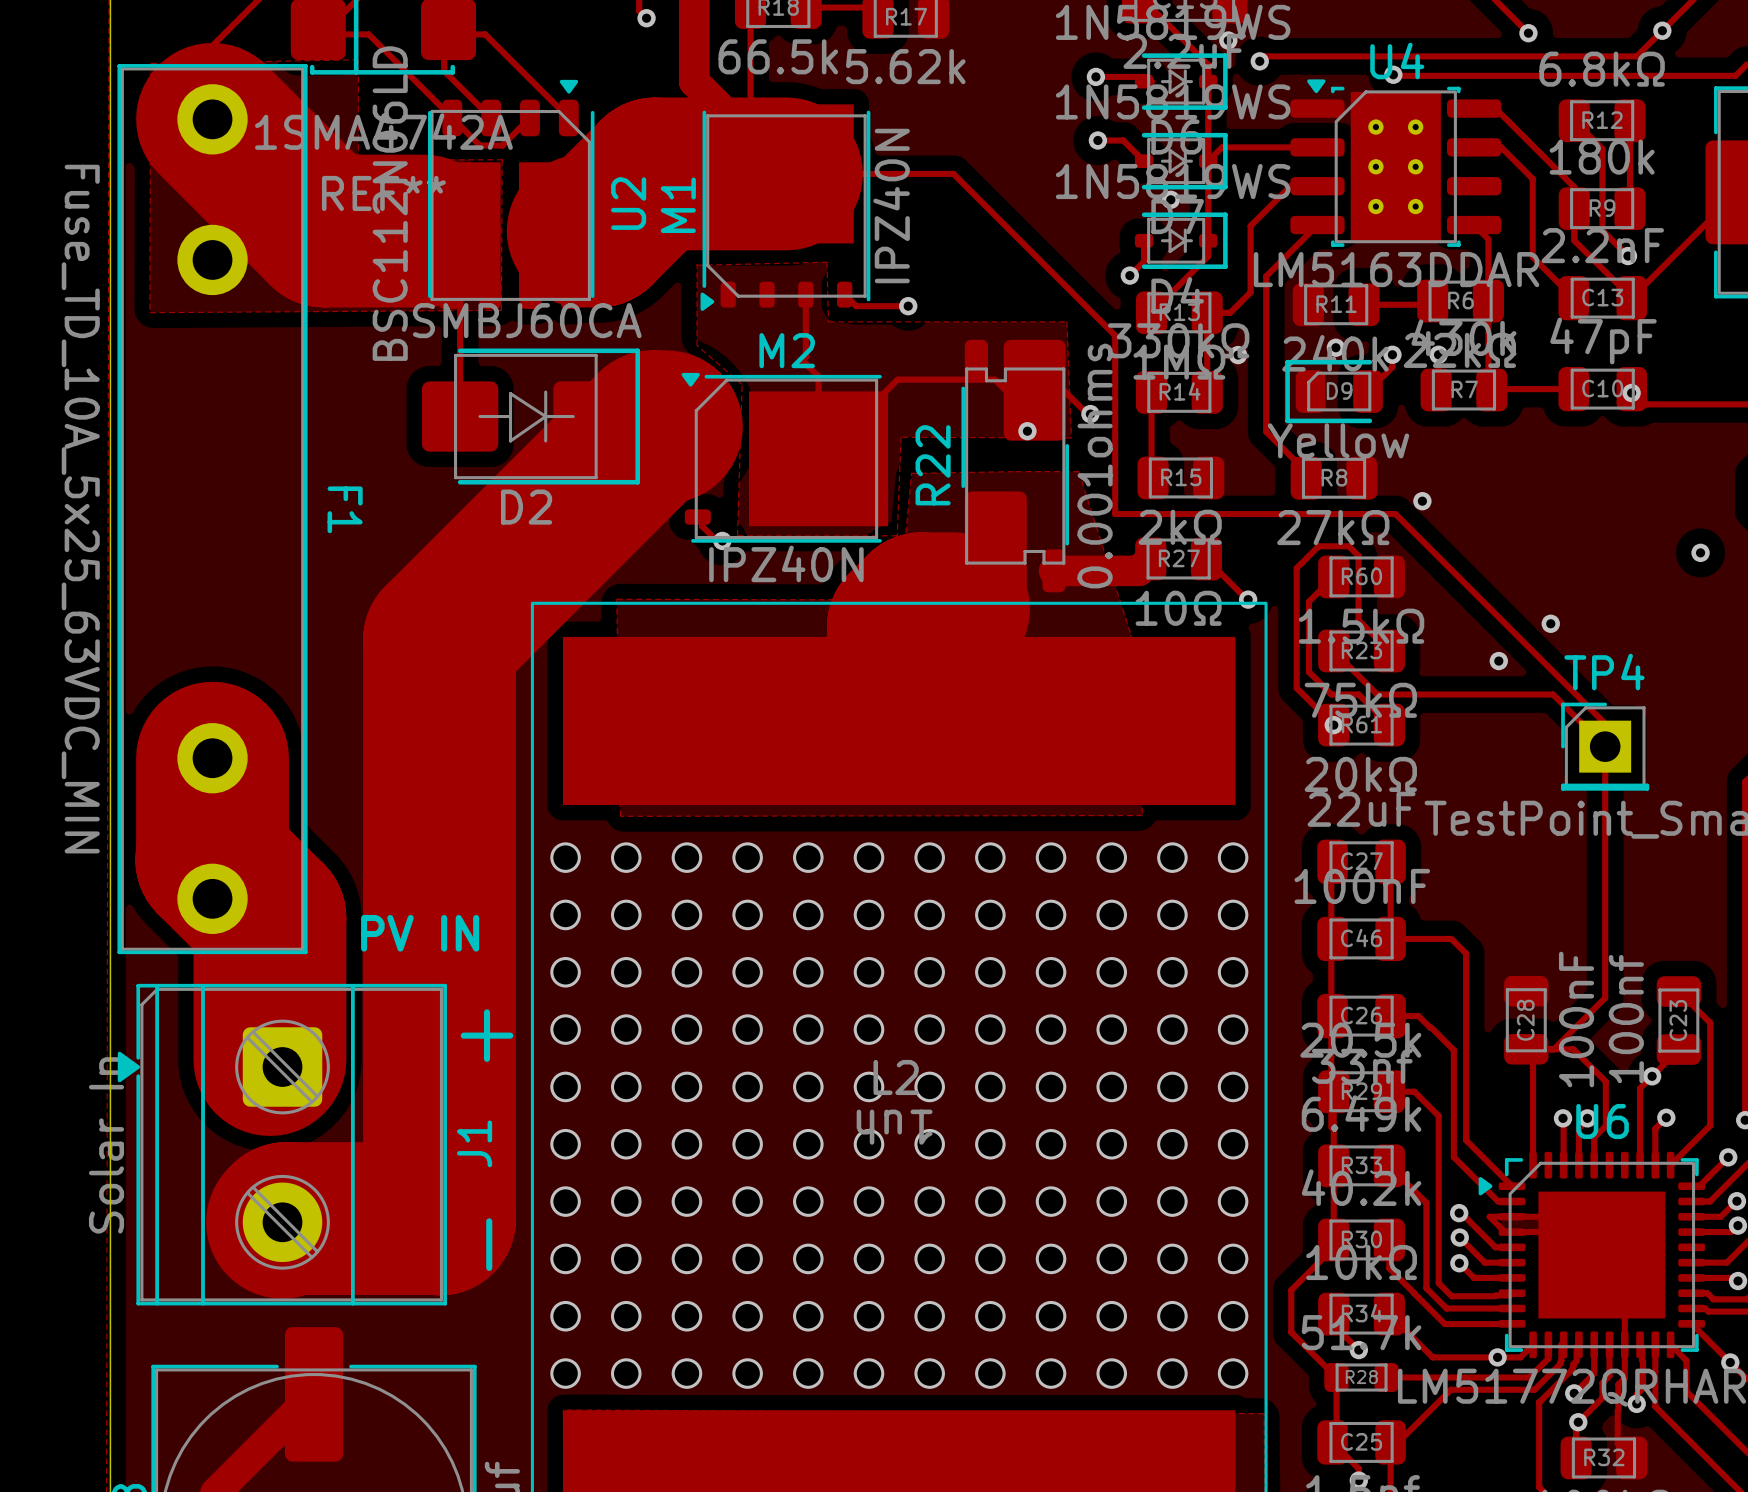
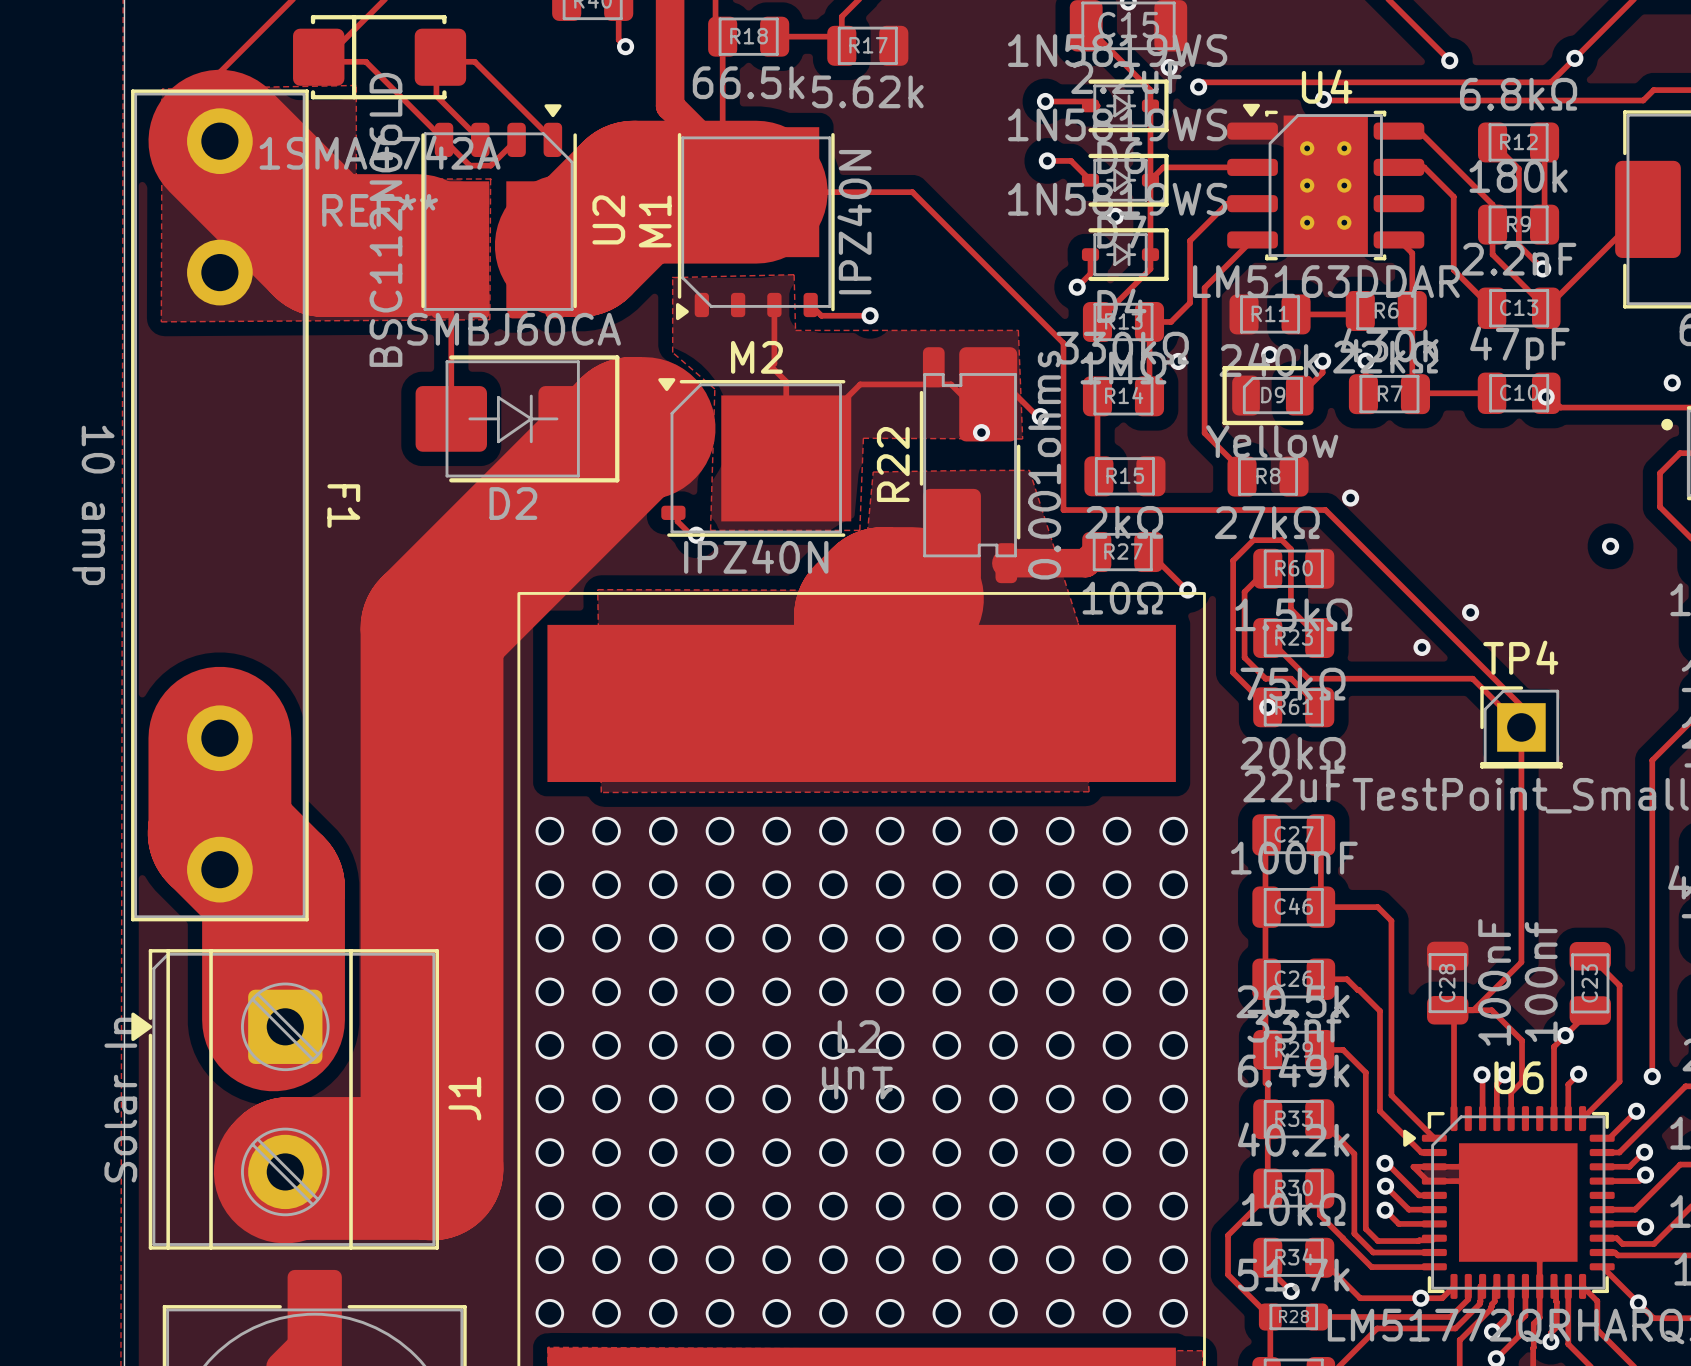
F1 value: Fuse_TD_10A_5x25_63VDC_MIN (80, 509) -> 10 amp (93, 505)
text: PV IN (420, 933) -> none
text: + (487, 1035) -> none
text: - (489, 1244) -> none

